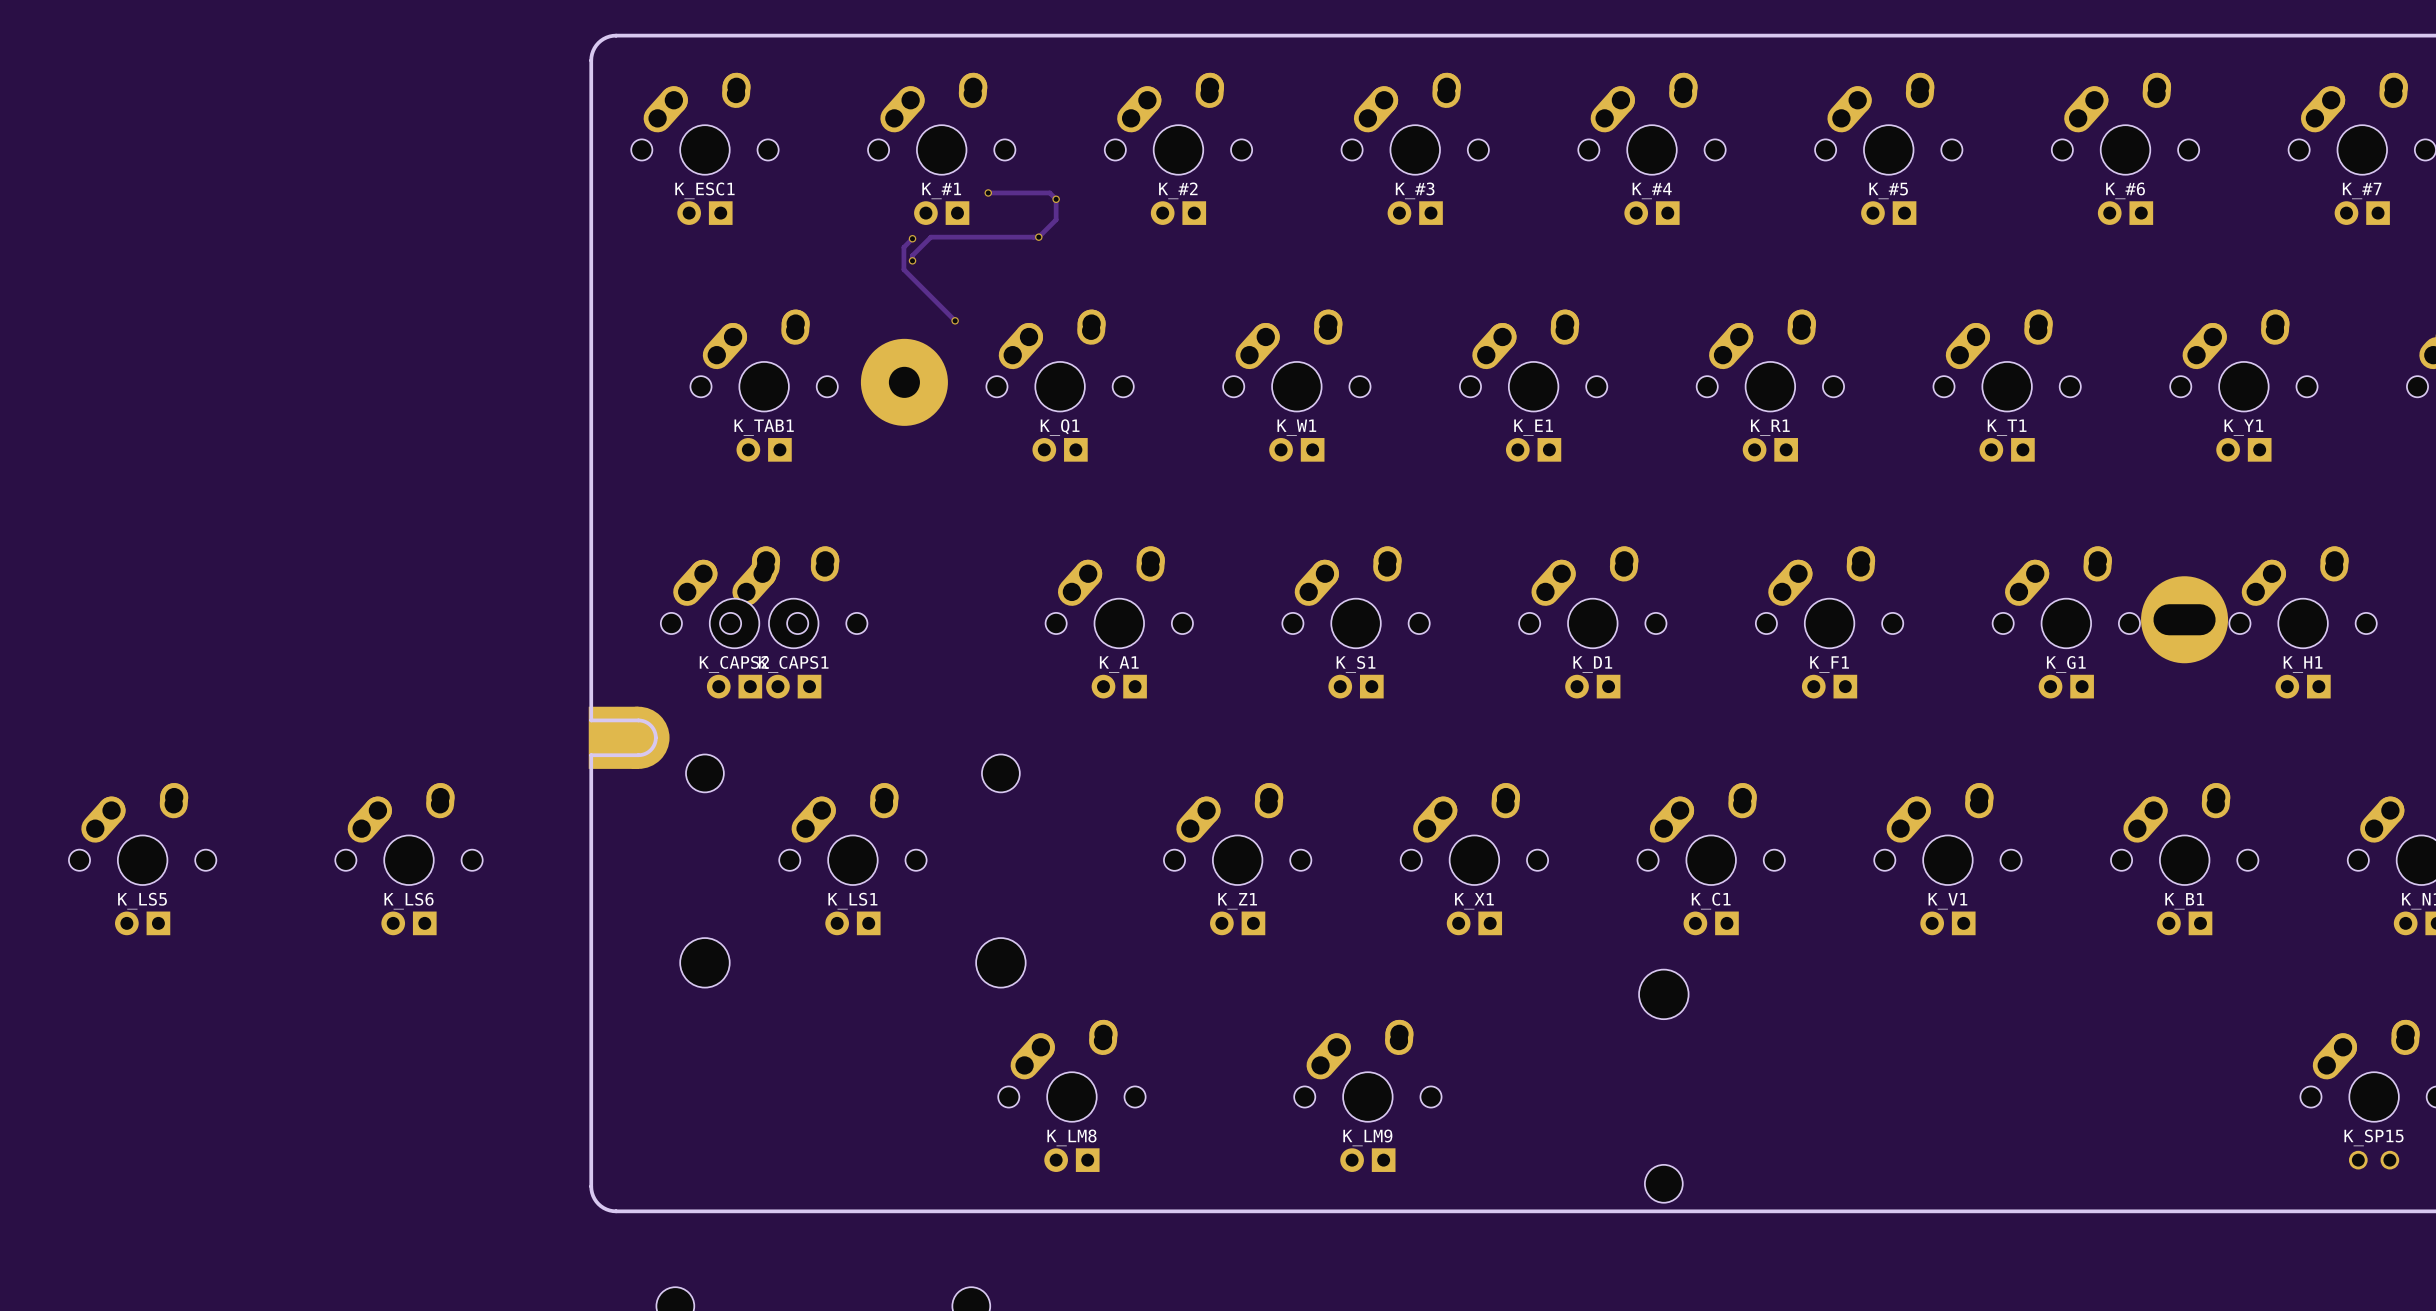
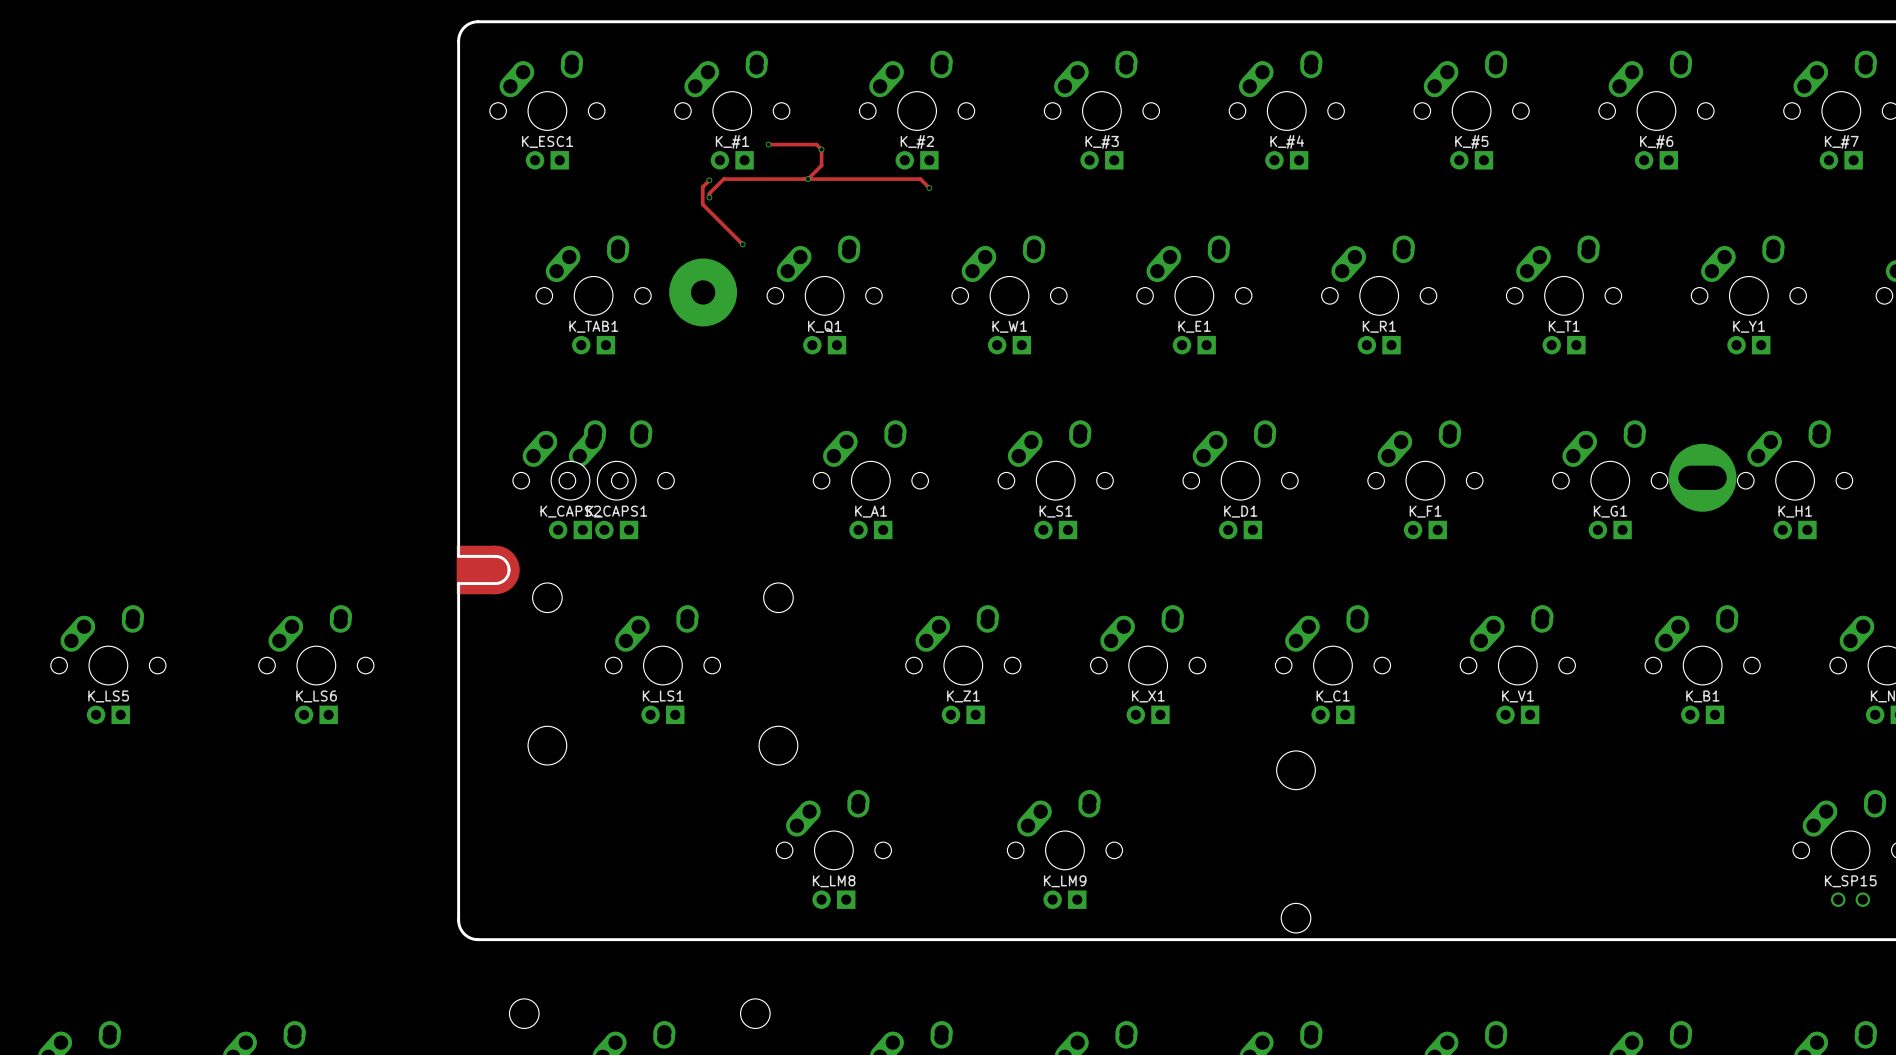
track: none -> (808, 179) (920, 179) (929, 188)
via: none -> (929, 188)

